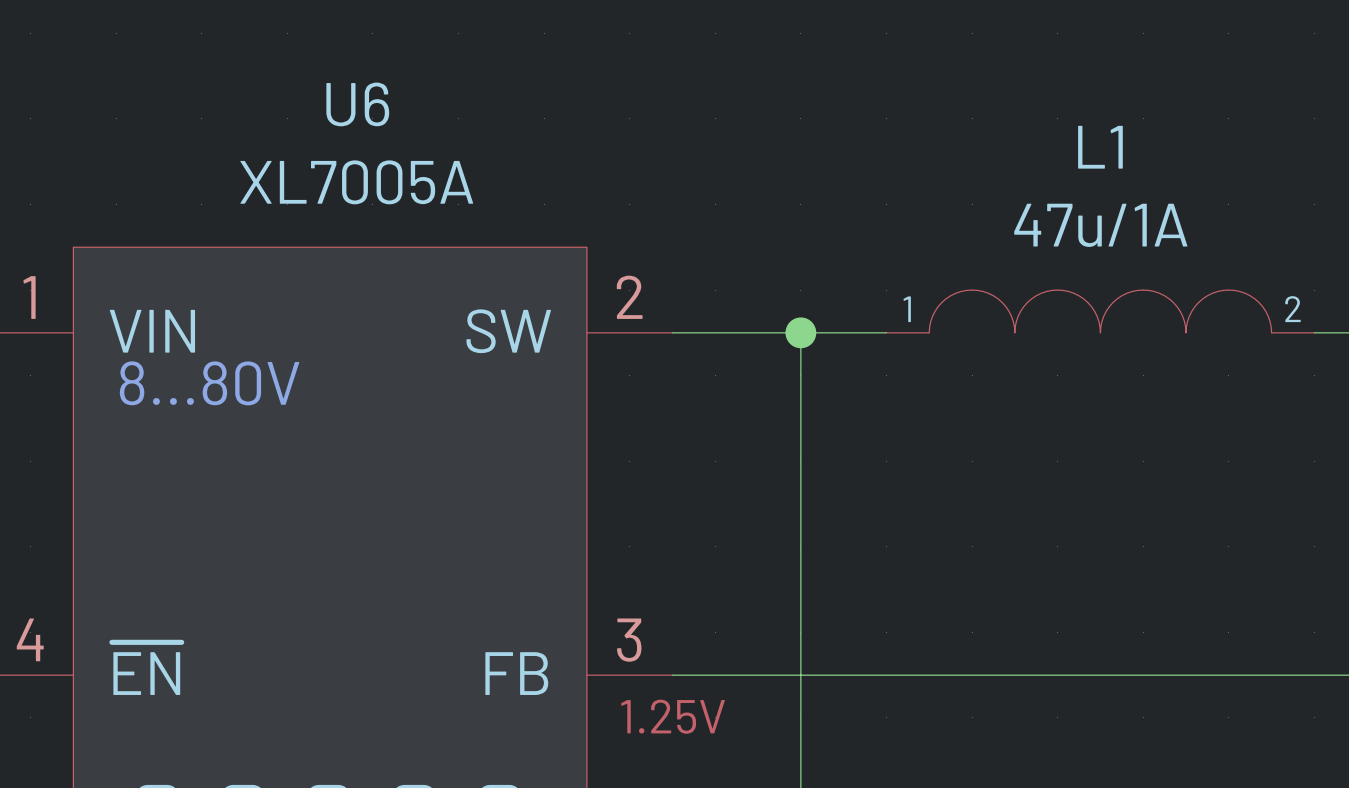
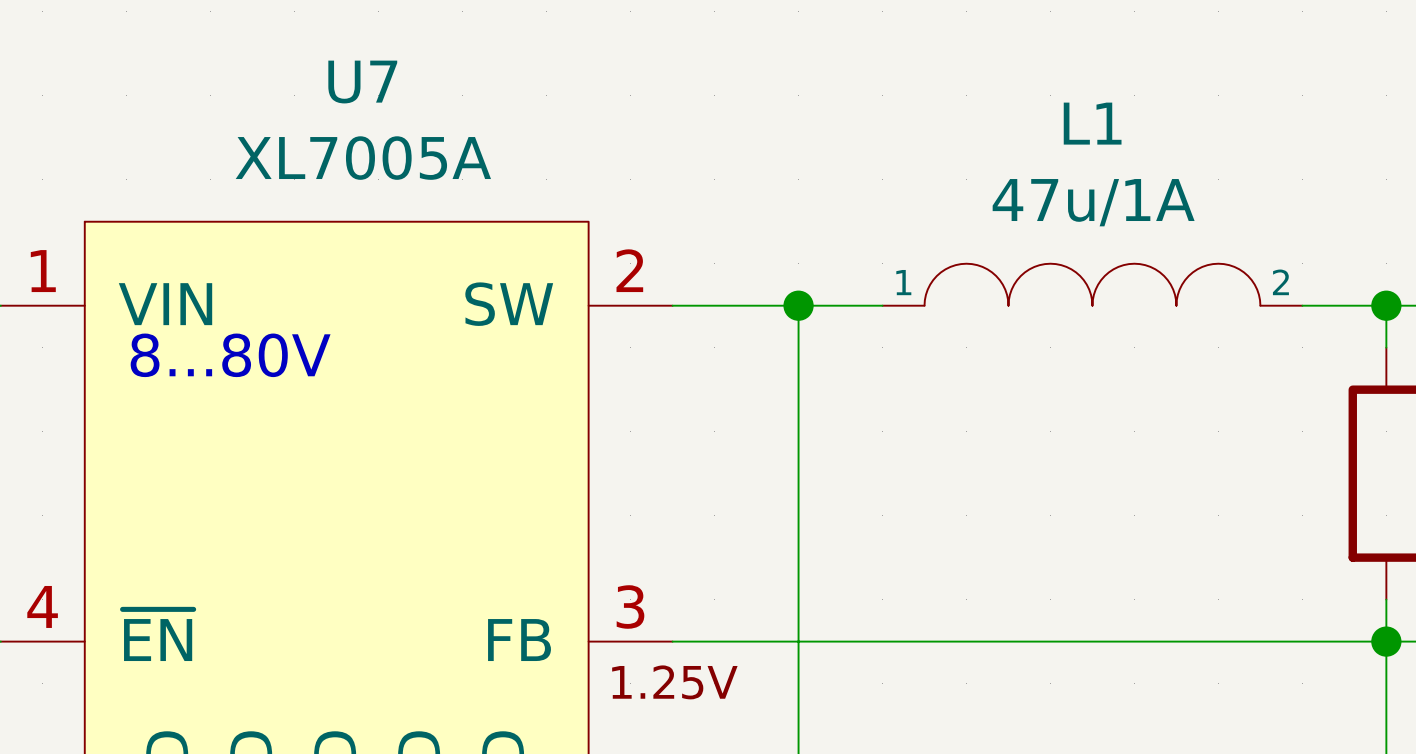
U6 name: U6 (357, 104) -> U7 (362, 82)

